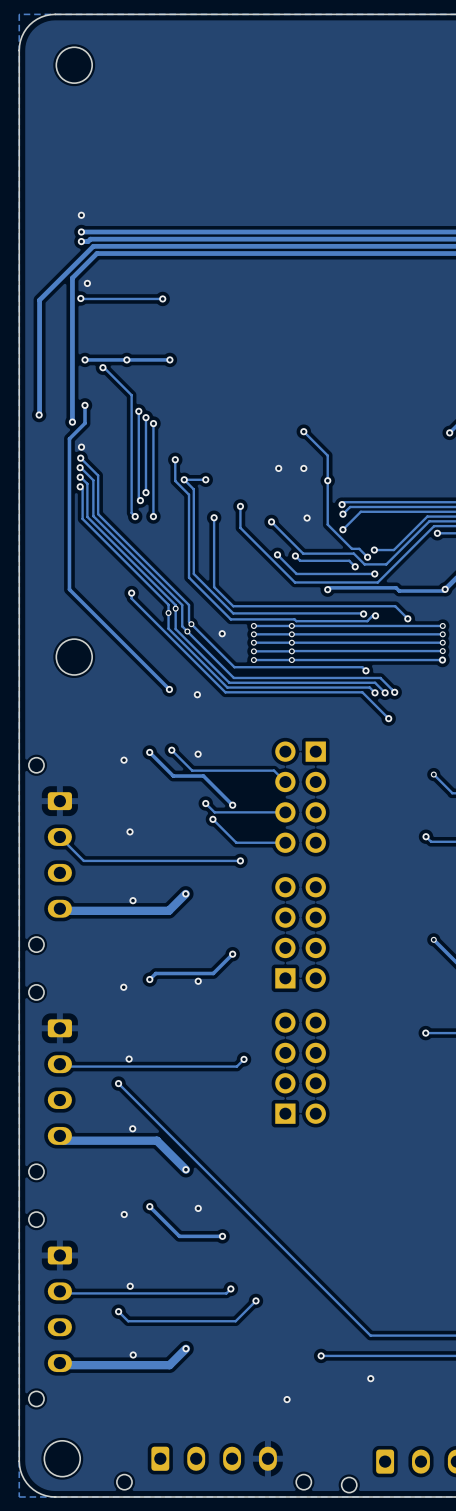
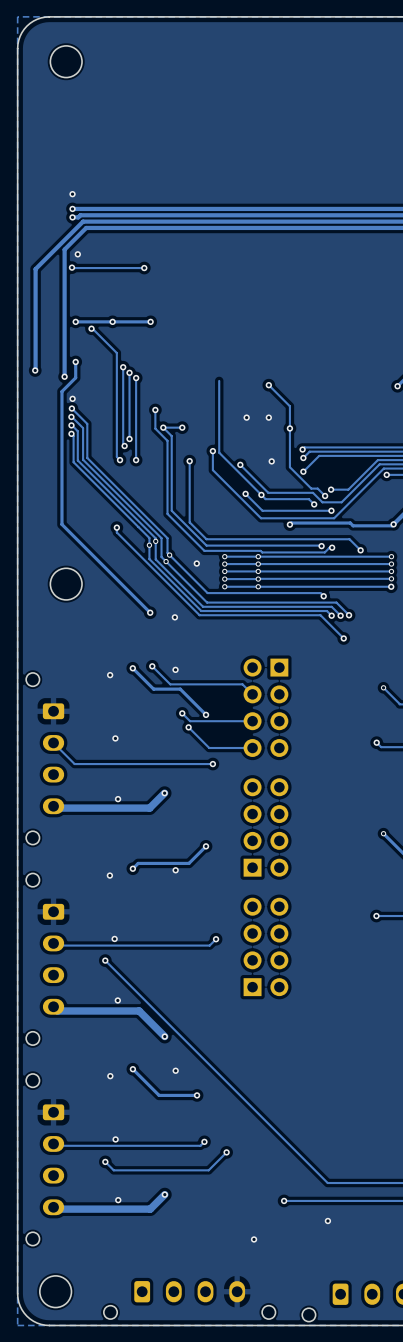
track: none -> (219, 380) (219, 452) (261, 494)

